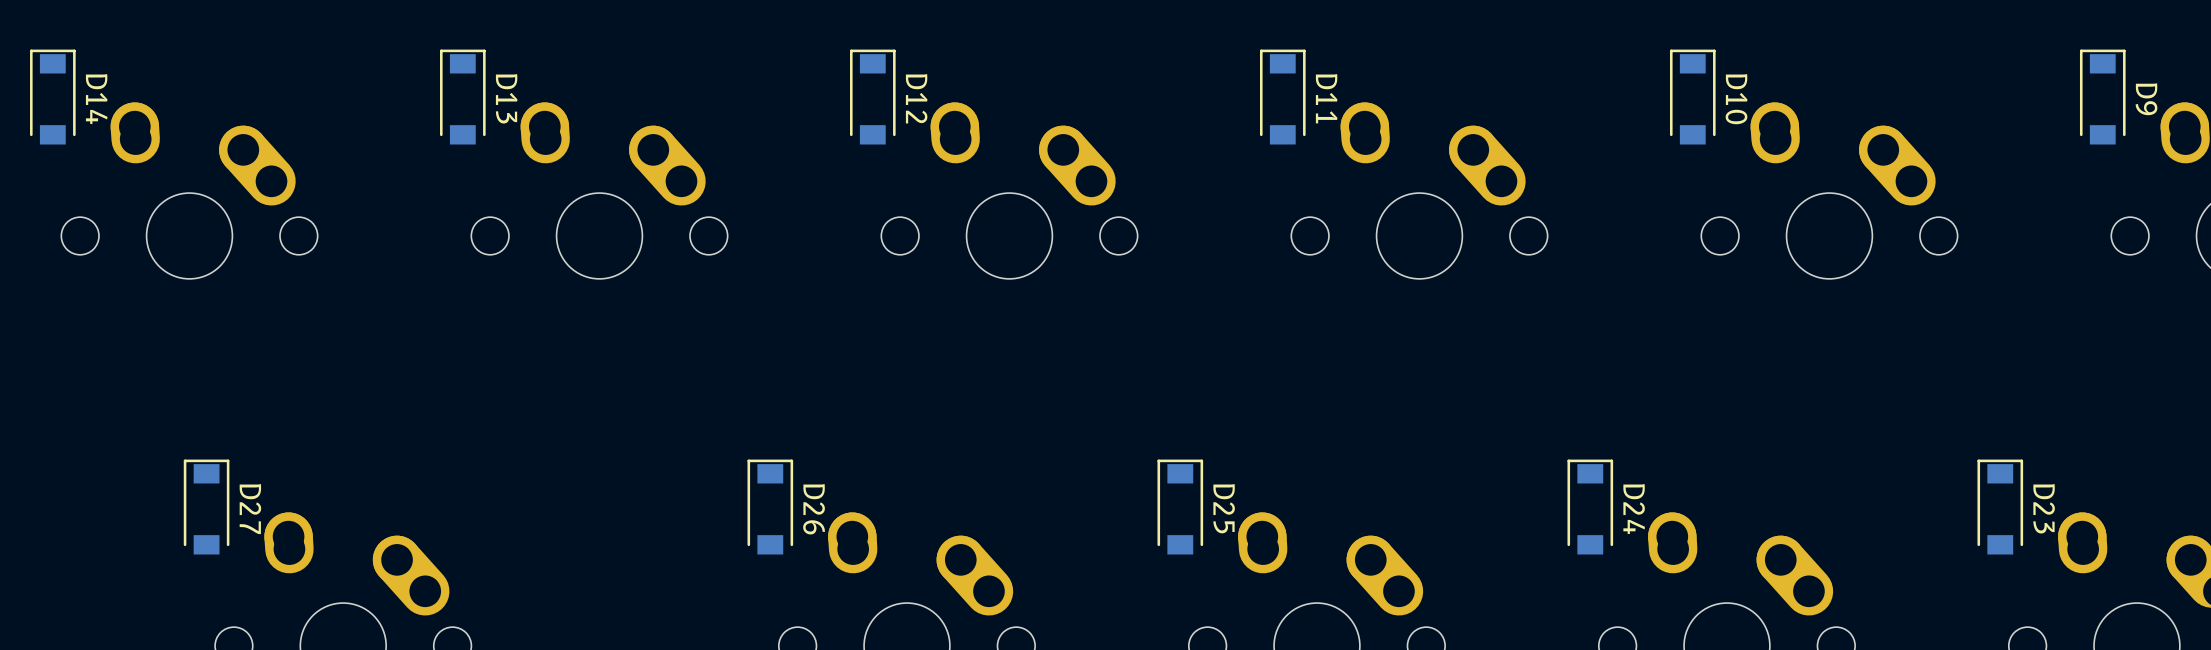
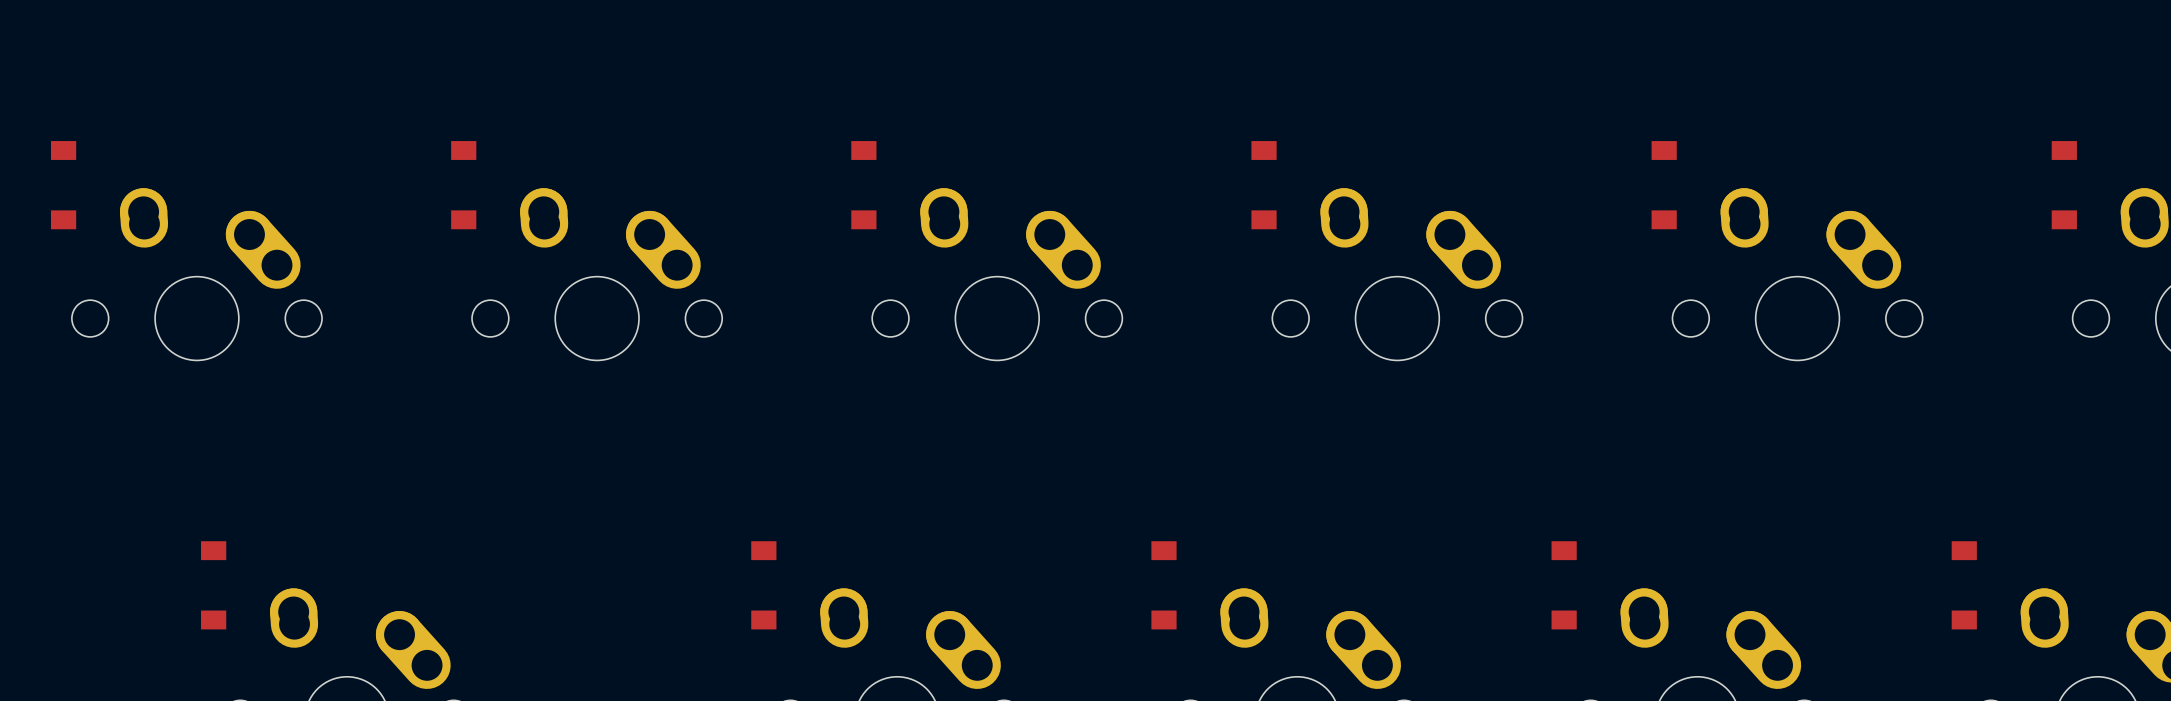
D14 side: bottom (52, 97) -> top (63, 185)
D13 side: bottom (462, 97) -> top (463, 185)
D12 side: bottom (872, 97) -> top (863, 185)
D11 side: bottom (1282, 97) -> top (1264, 185)
D10 side: bottom (1692, 97) -> top (1664, 185)
D9 side: bottom (2102, 97) -> top (2064, 185)
D27 side: bottom (206, 507) -> top (213, 585)
D26 side: bottom (770, 507) -> top (763, 585)
D25 side: bottom (1180, 507) -> top (1163, 585)
D24 side: bottom (1590, 507) -> top (1564, 585)
D23 side: bottom (2000, 507) -> top (1964, 585)

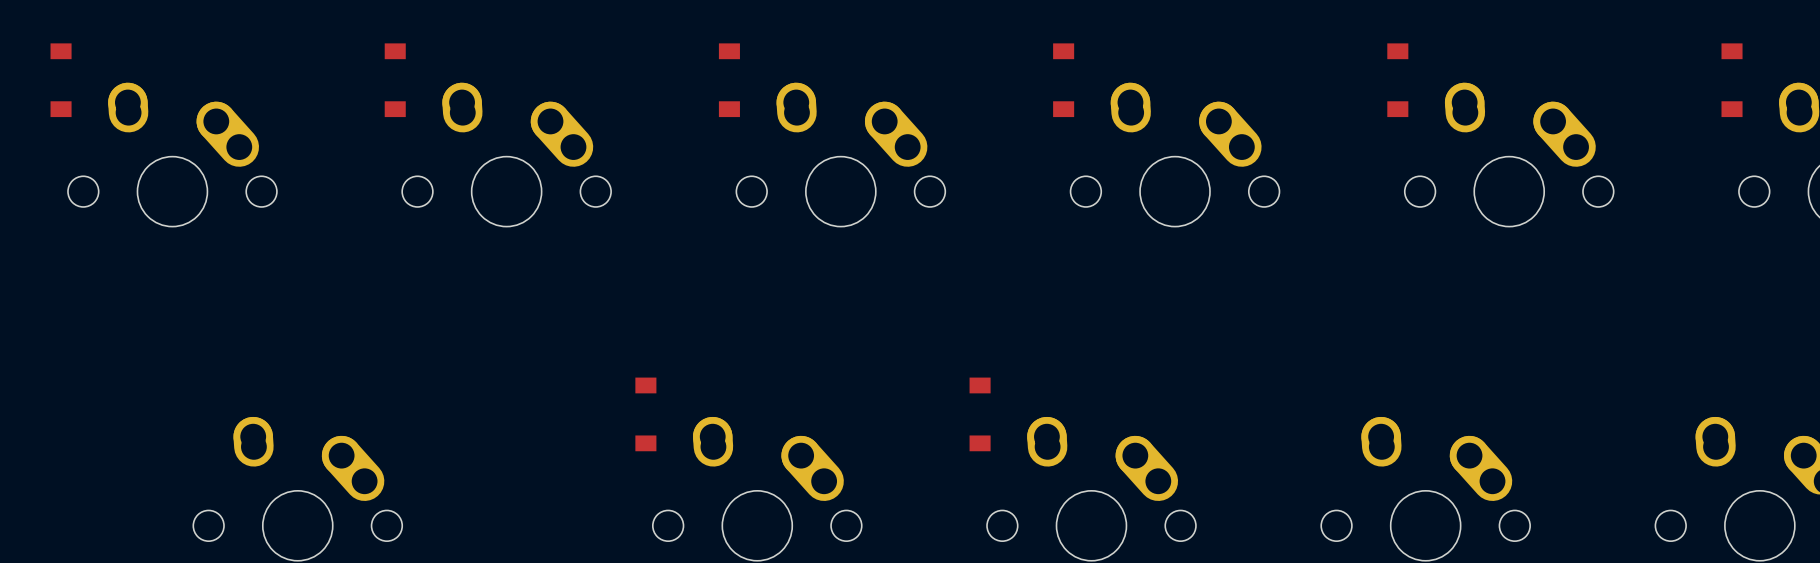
part: (213, 585) -> none
part: (1564, 585) -> none
part: (1964, 585) -> none

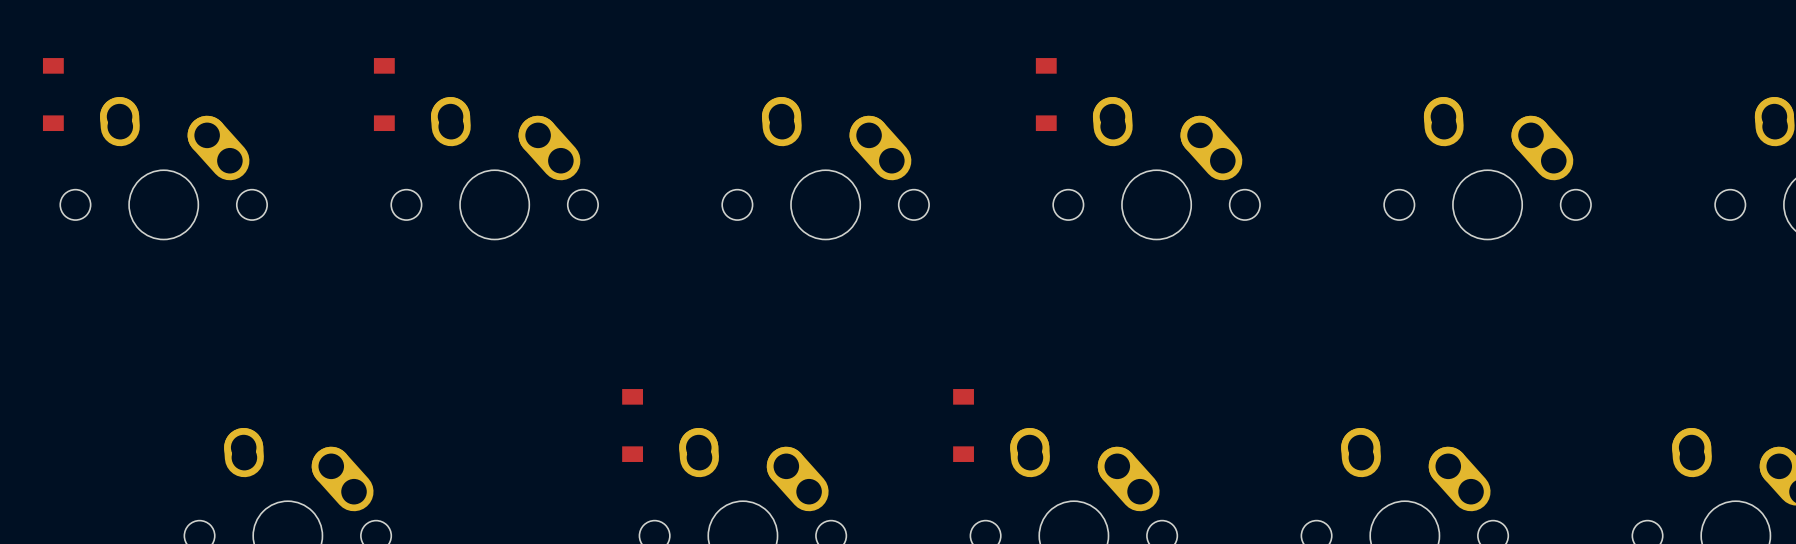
part: (729, 80) -> none
part: (1397, 80) -> none
part: (1732, 80) -> none

